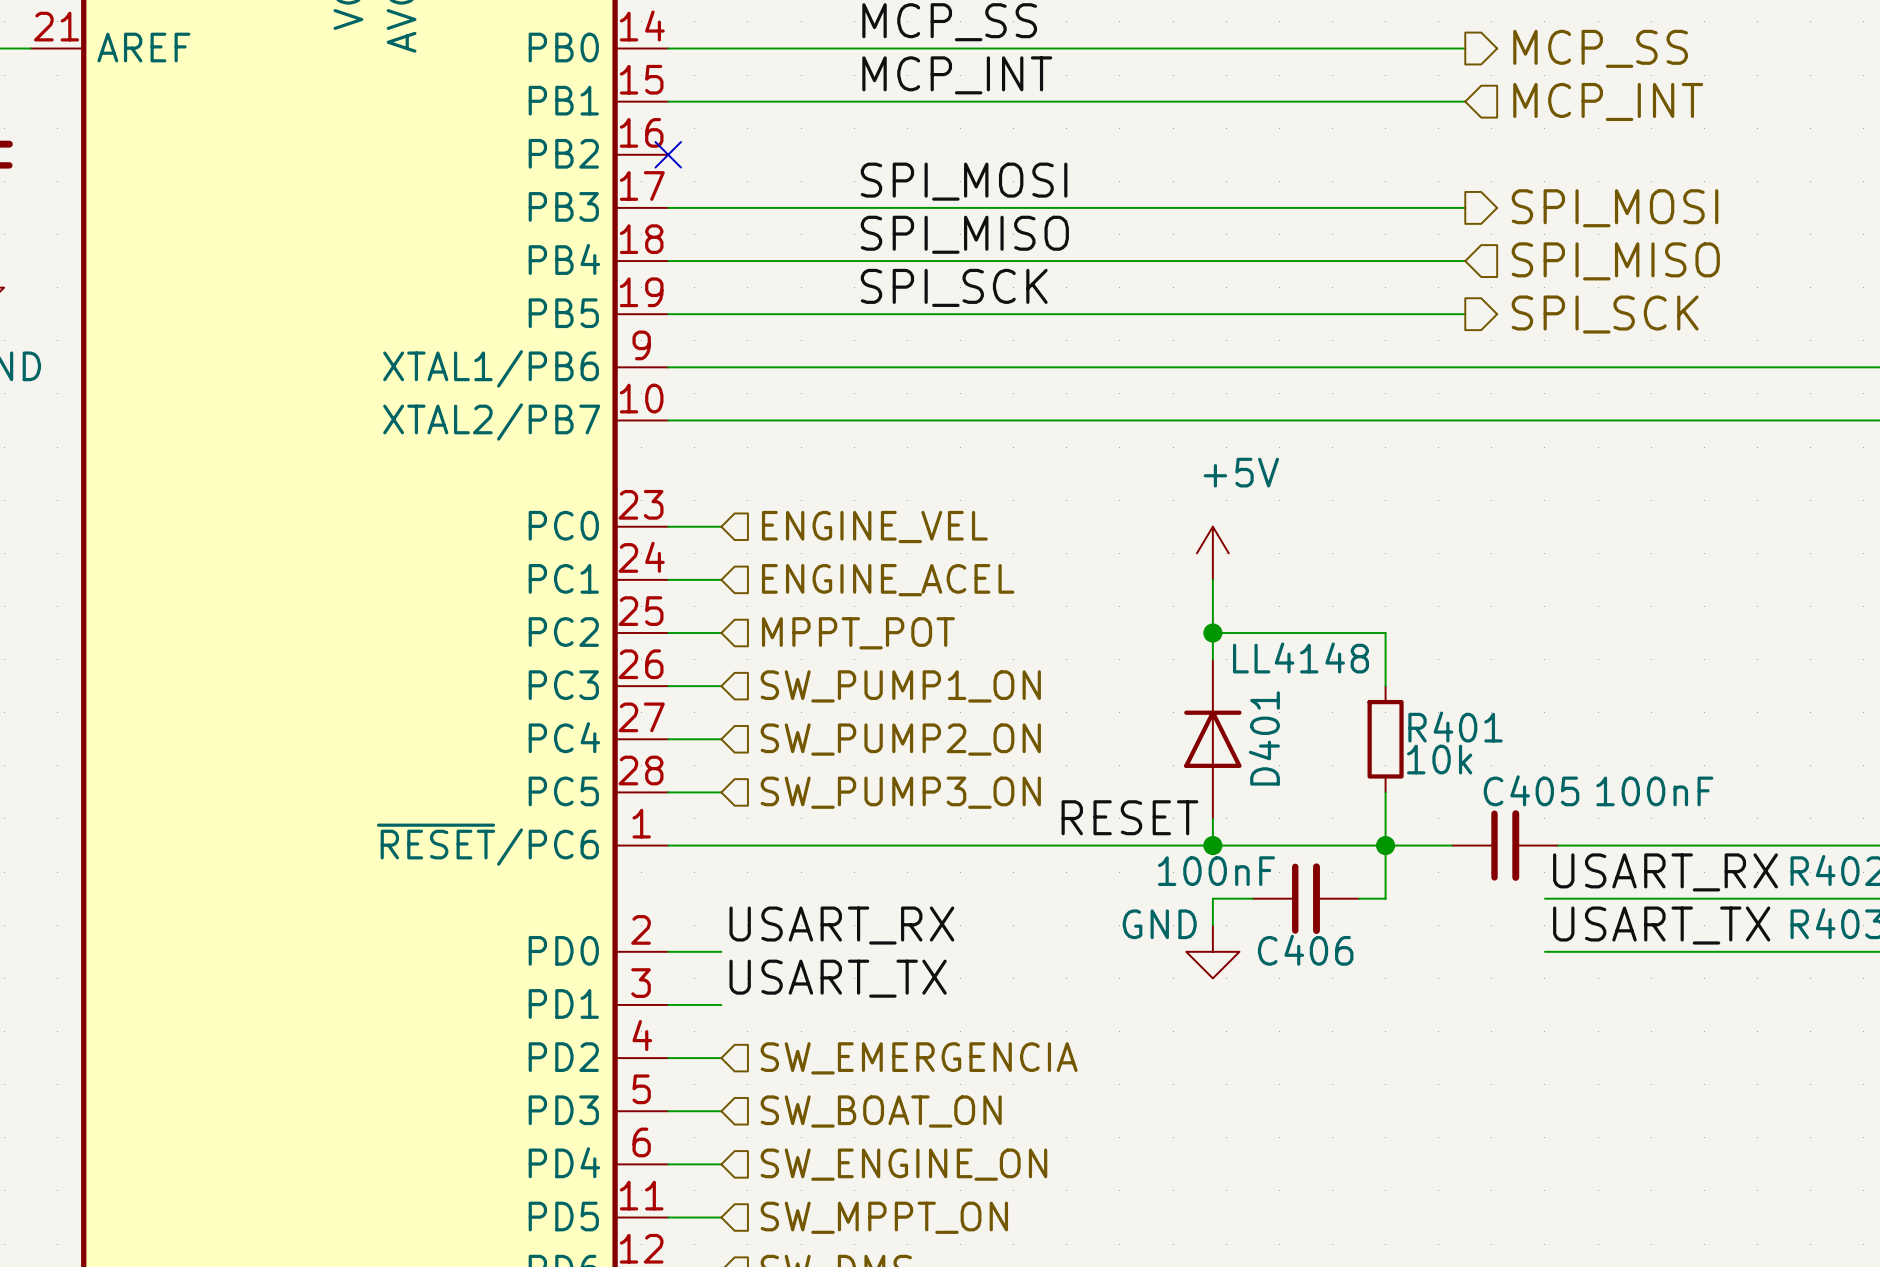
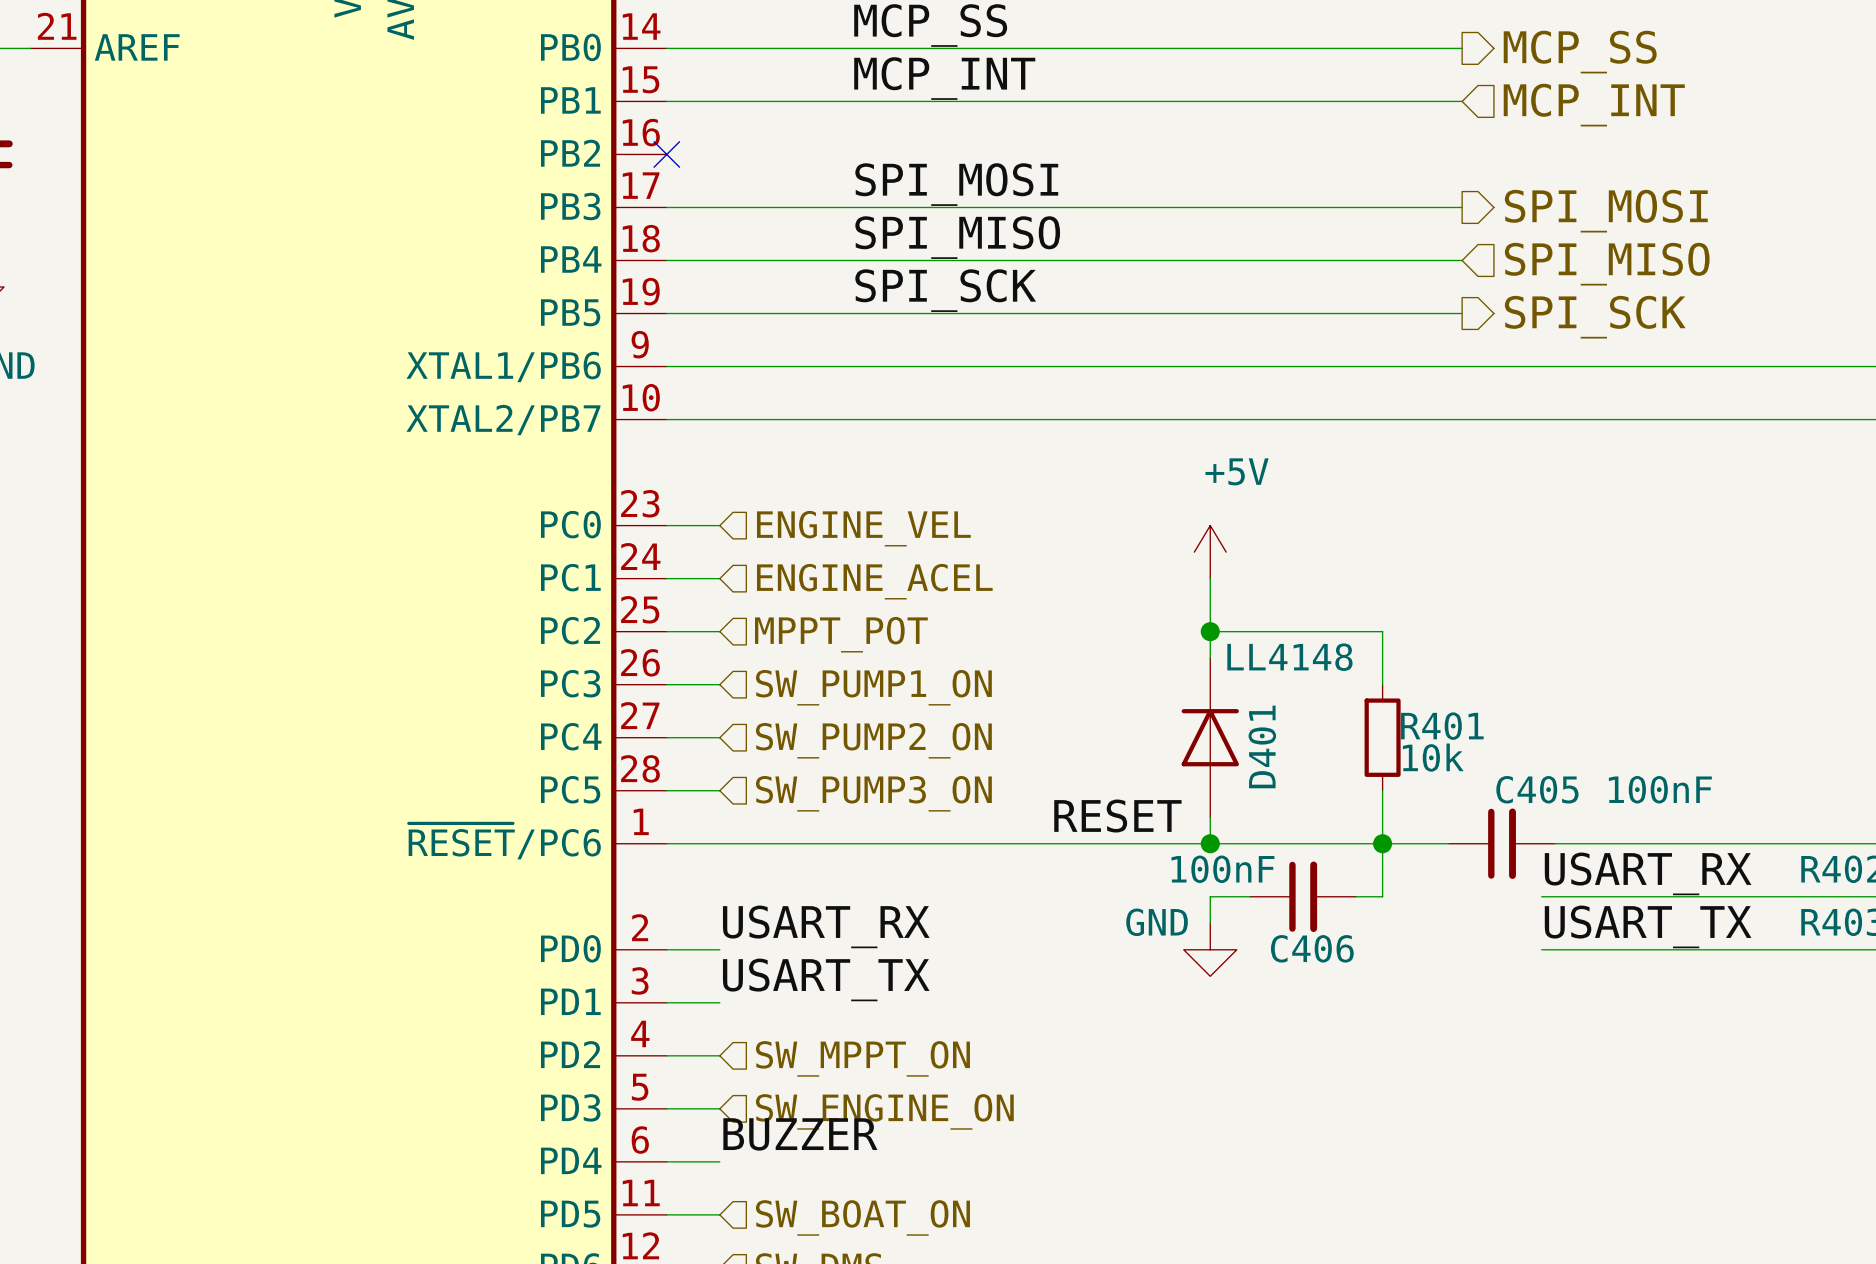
hierarchical label: SW_EMERGENCIA (919, 1058) -> SW_MPPT_ON (862, 1058)
hierarchical label: SW_BOAT_ON (881, 1111) -> SW_ENGINE_ON (884, 1111)
label: none -> BUZZER (800, 1134)
hierarchical label: SW_ENGINE_ON (903, 1164) -> none
hierarchical label: SW_MPPT_ON (884, 1217) -> SW_BOAT_ON (862, 1217)

